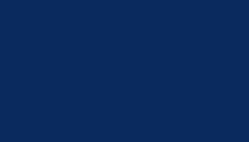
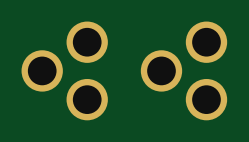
part: none -> (64, 70)
part: none -> (183, 70)

